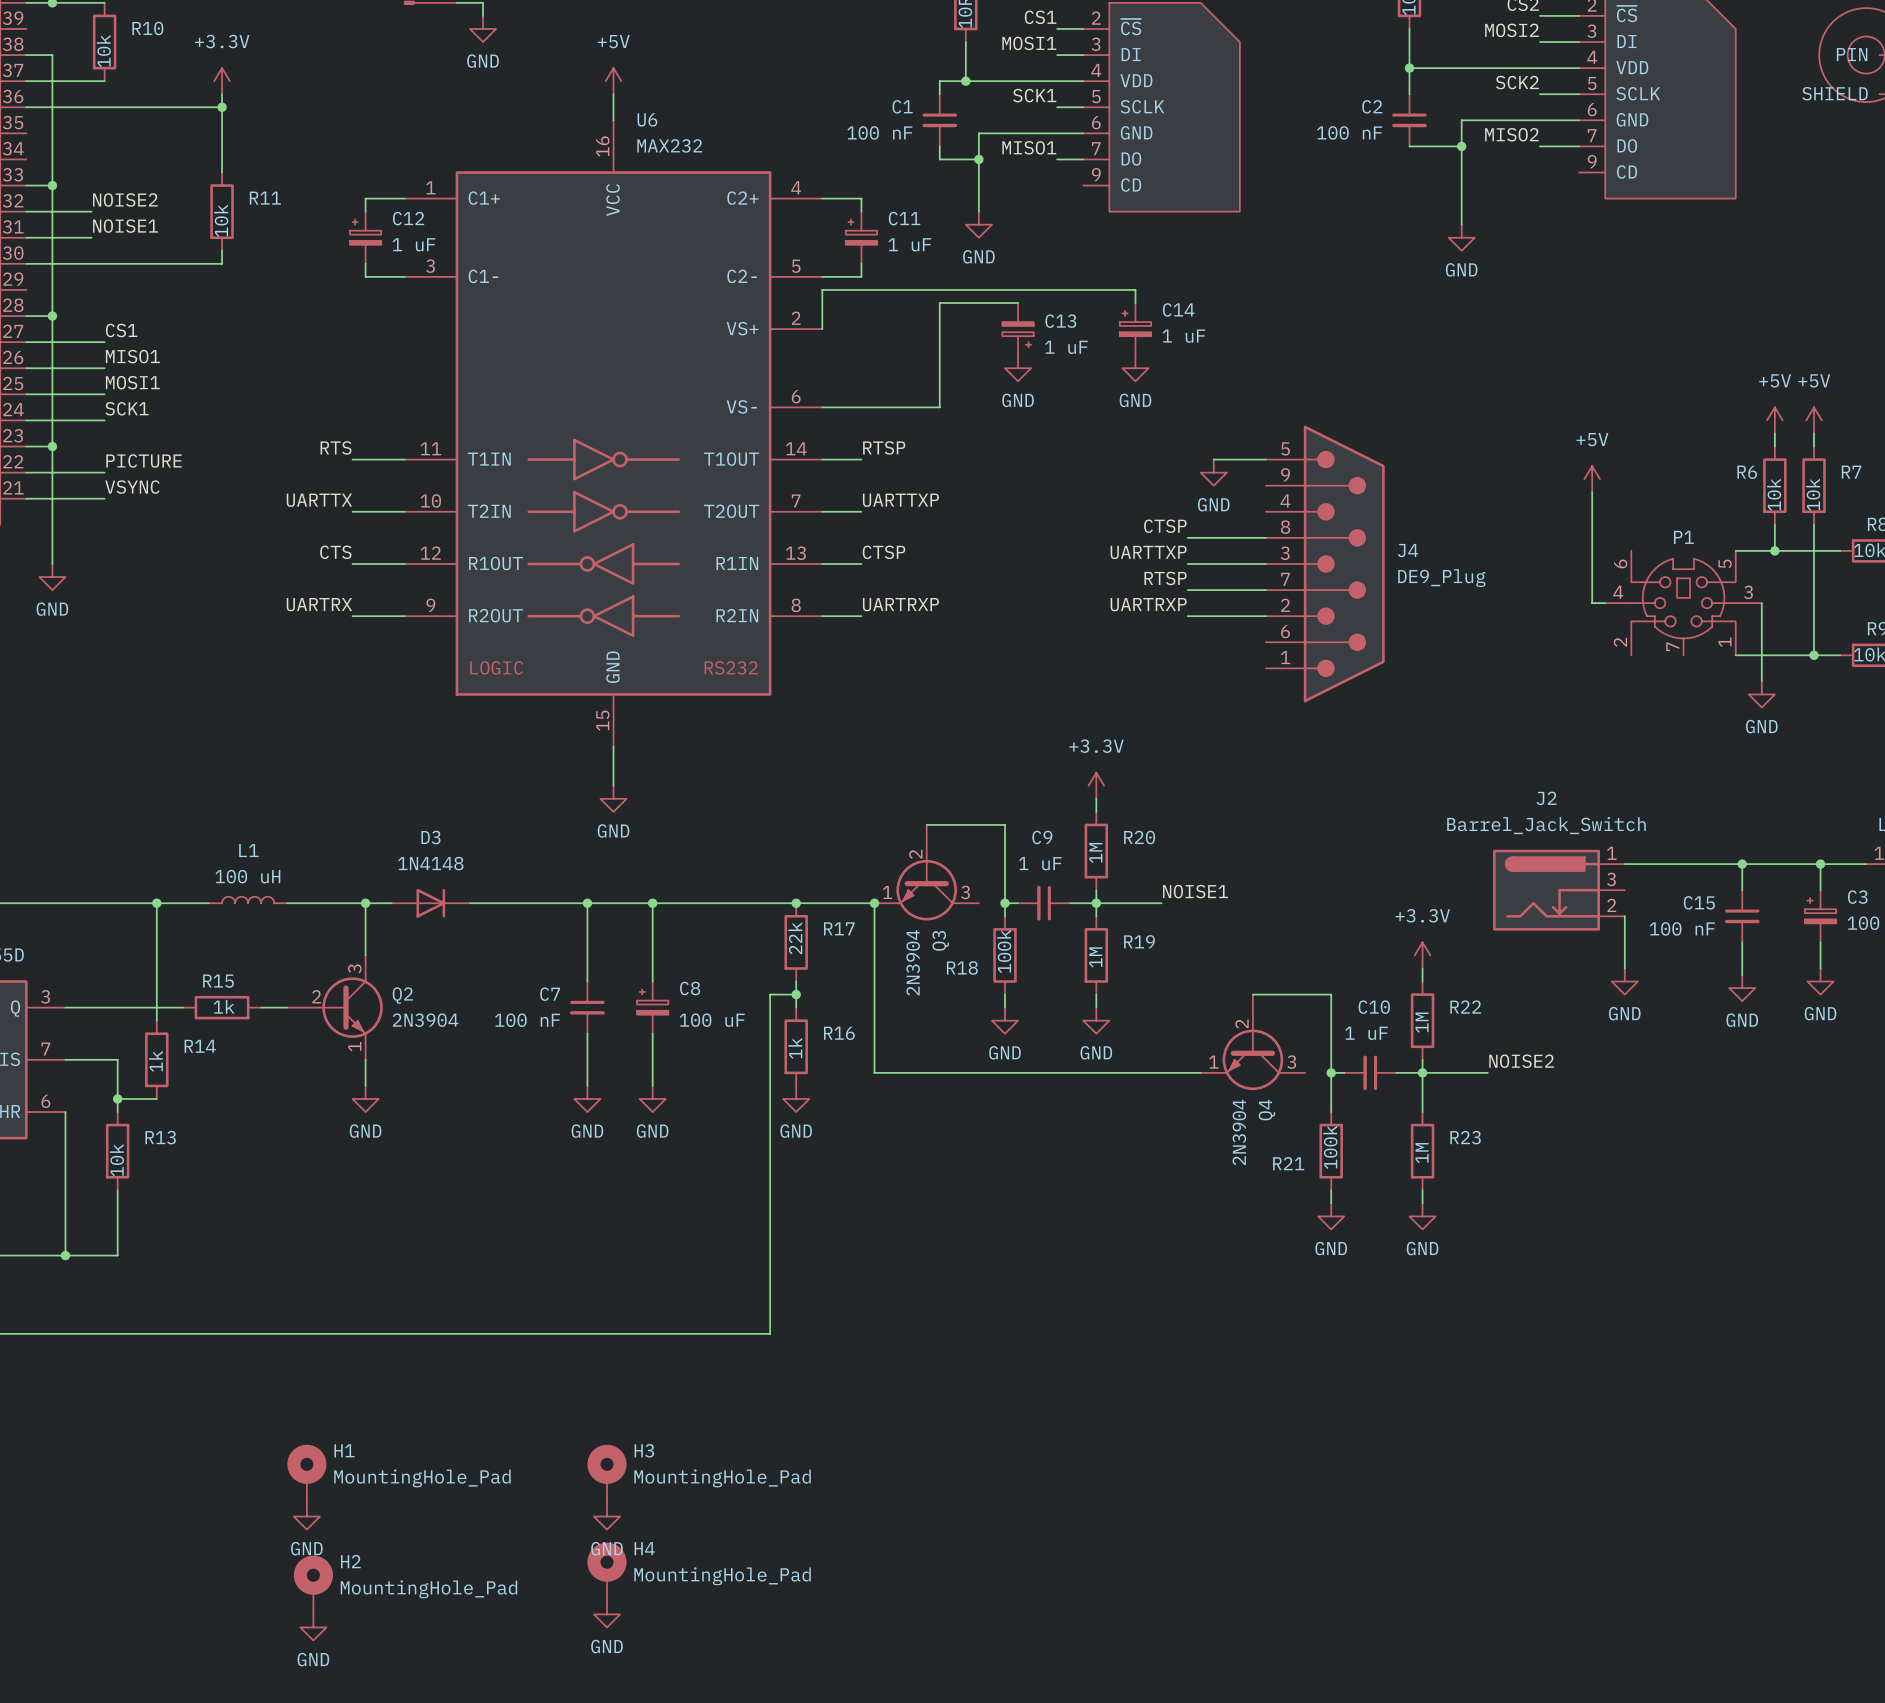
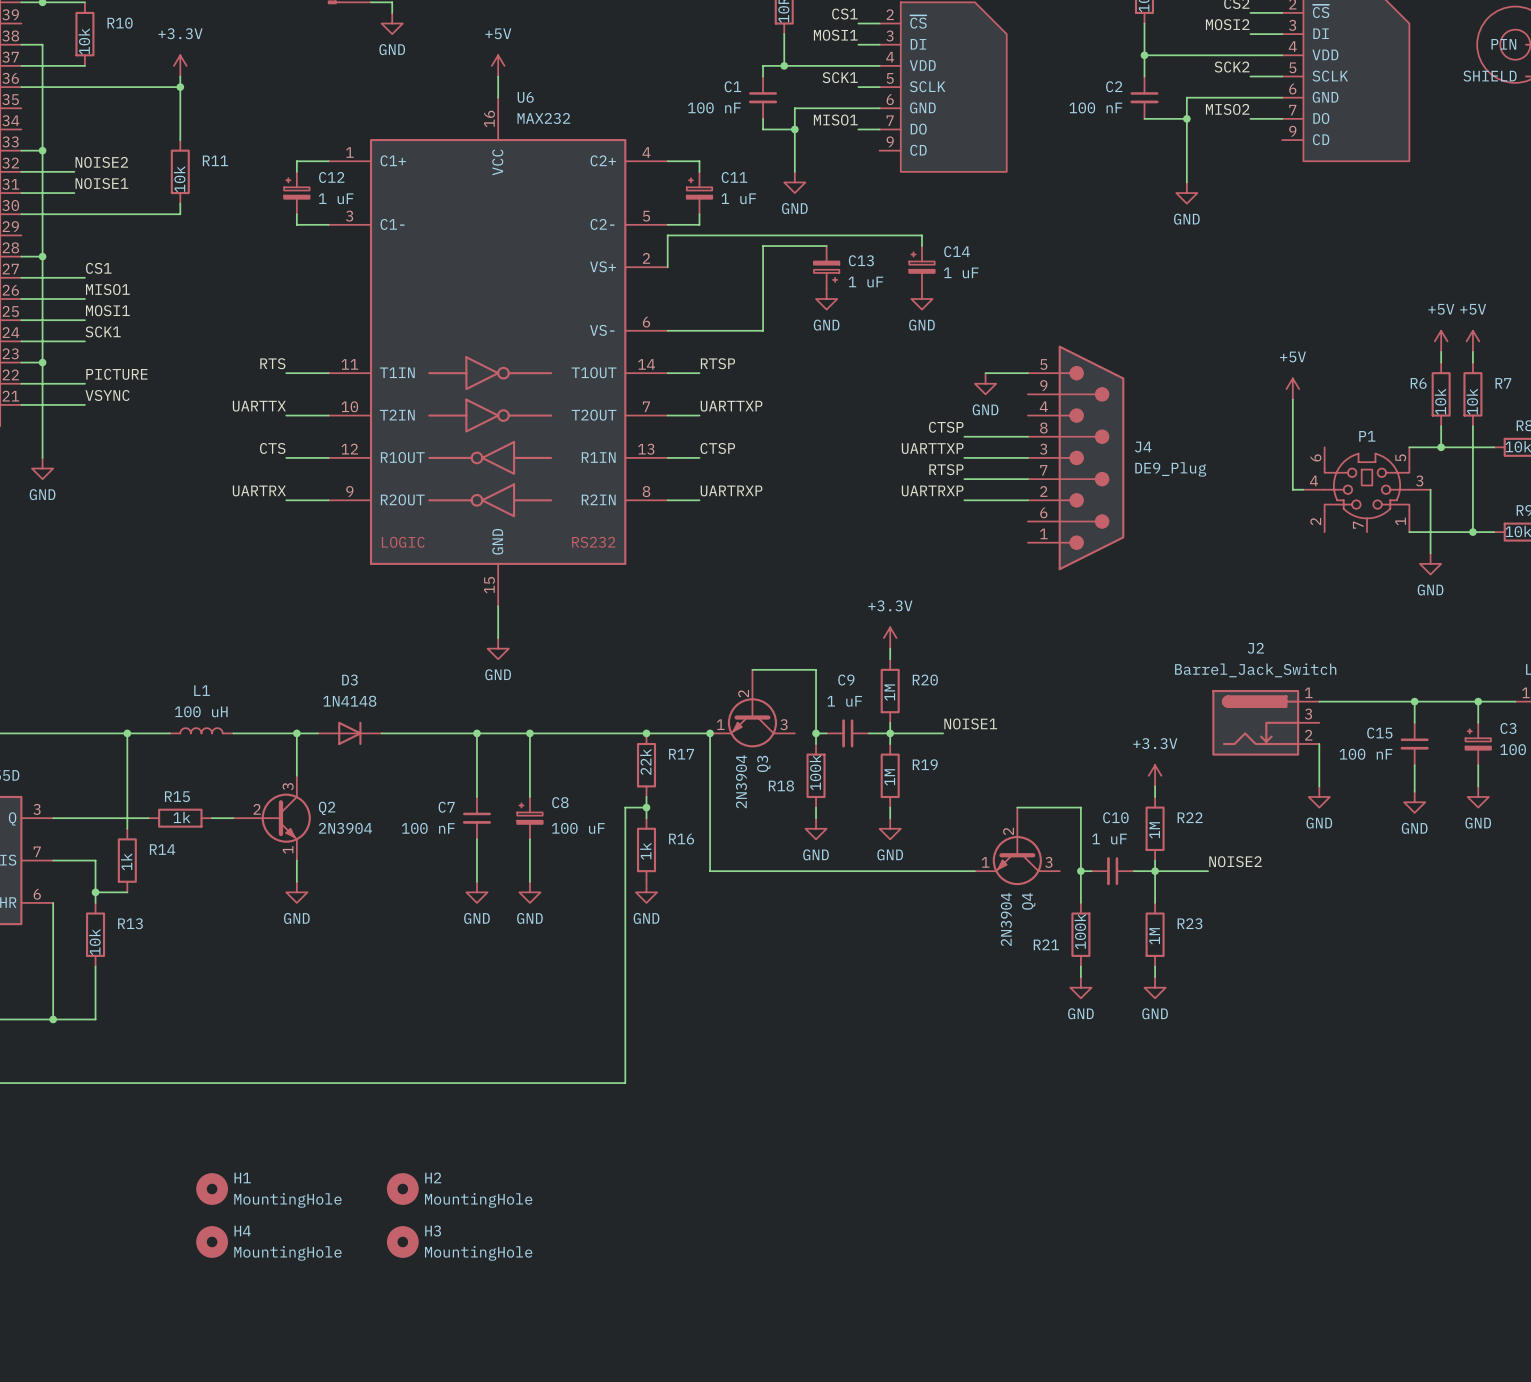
H1 symbol: [287, 1444, 327, 1504] -> [196, 1173, 228, 1205]
H3 symbol: [587, 1444, 627, 1504] -> [386, 1226, 419, 1258]
H1 value: MountingHole_Pad (422, 1478) -> MountingHole (287, 1200)
H3 value: MountingHole_Pad (722, 1478) -> MountingHole (478, 1253)
power symbol: GND (306, 1516) -> none
power symbol: GND (607, 1516) -> none
H4 symbol: [587, 1542, 627, 1602] -> [196, 1226, 228, 1258]
H2 symbol: [293, 1555, 333, 1615] -> [386, 1173, 419, 1205]
H4 value: MountingHole_Pad (722, 1576) -> MountingHole (287, 1253)
H2 value: MountingHole_Pad (428, 1589) -> MountingHole (478, 1200)
power symbol: GND (607, 1614) -> none
power symbol: GND (313, 1627) -> none

